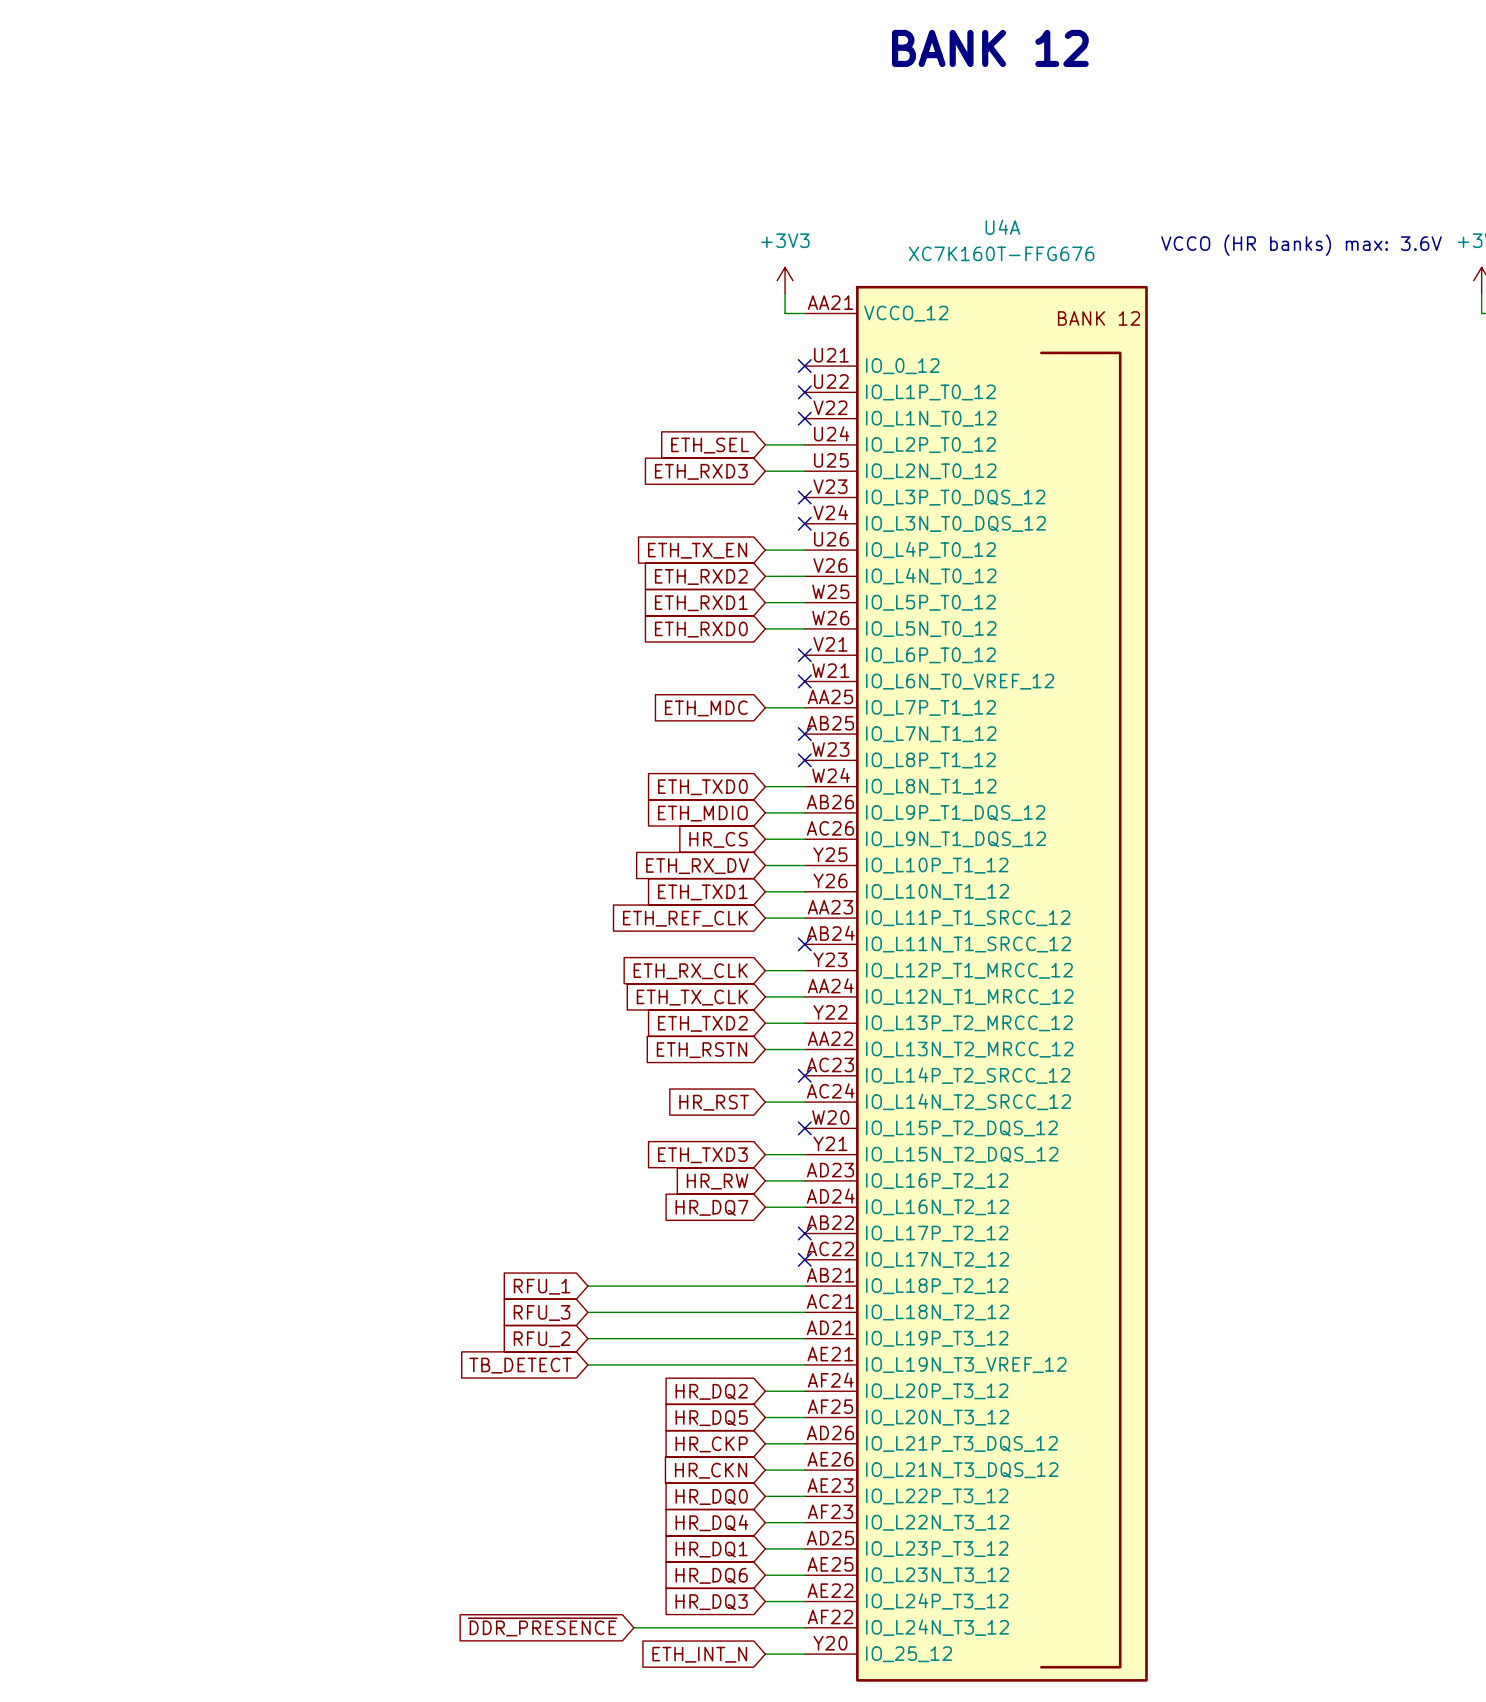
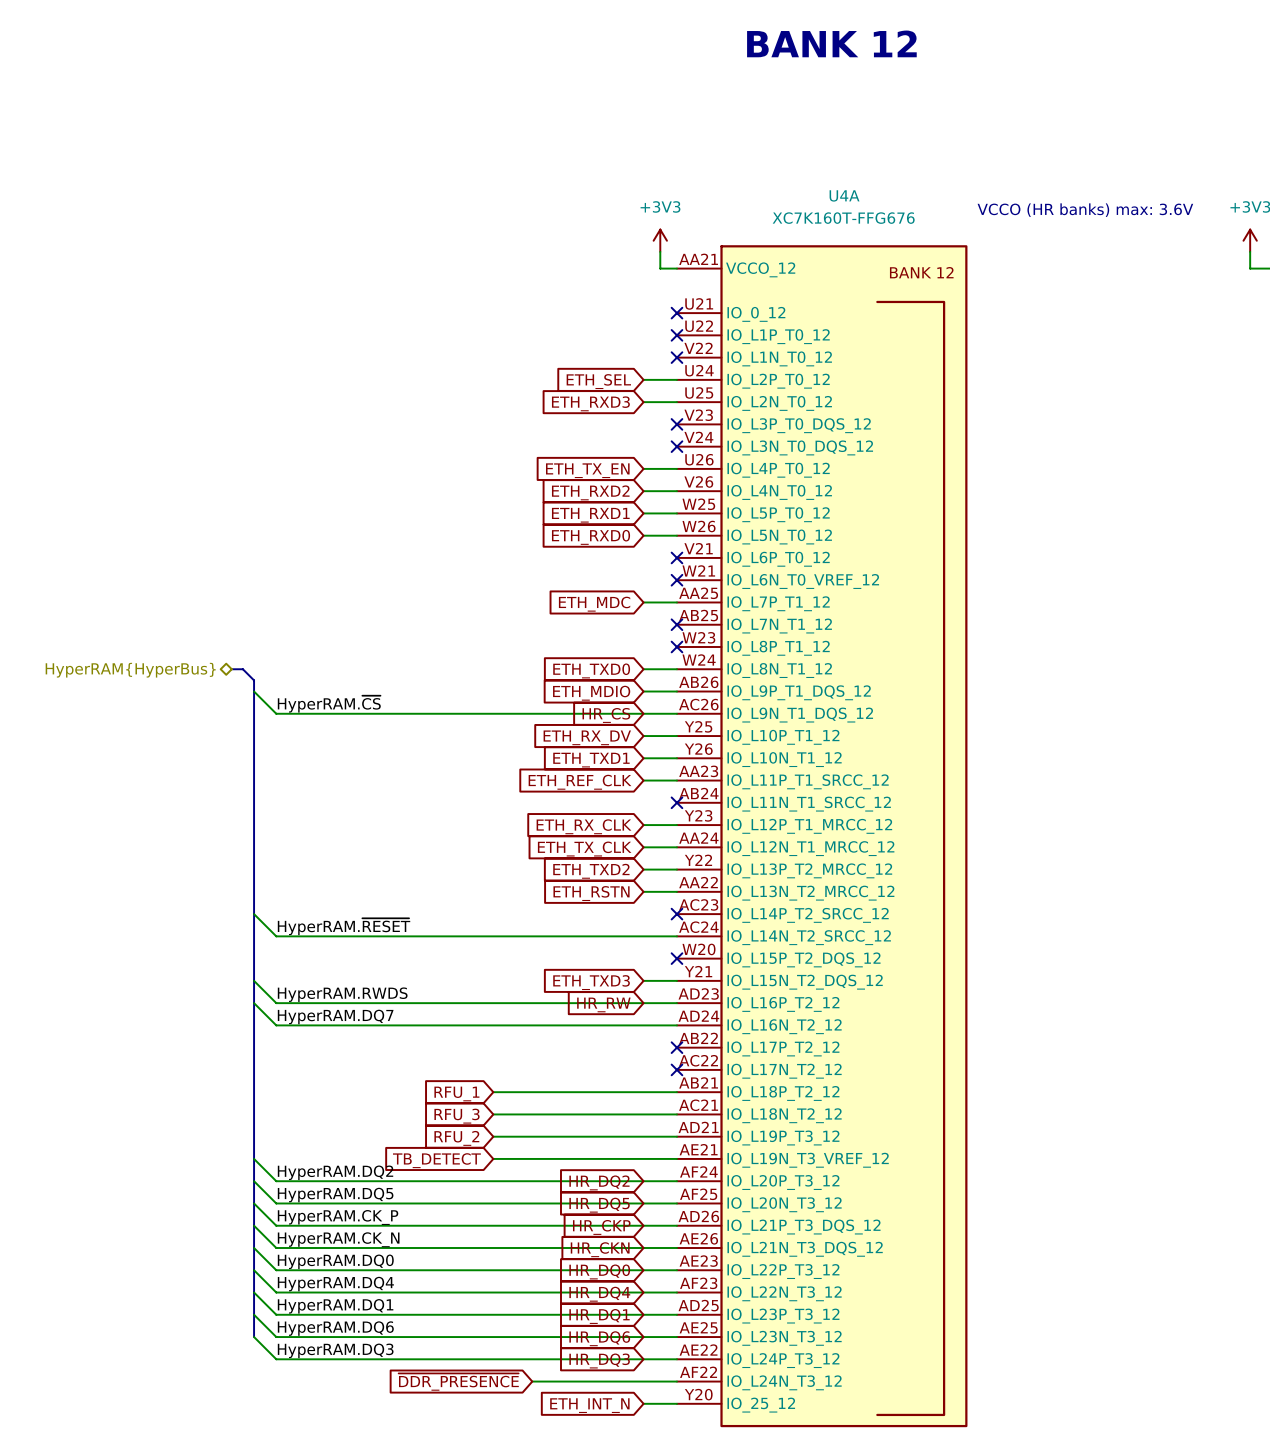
bus: none -> (231, 669) (242, 669) (254, 680) (254, 1337)
hierarchical label: none -> HyperRAM{HyperBus} (130, 670)
wire: none -> (254, 691) (276, 713) (643, 713)
label: none -> HyperRAM.~{CS} (329, 704)
wire: none -> (254, 914) (276, 936) (643, 936)
label: none -> HyperRAM.~{RESET} (344, 926)
global label: HR_RST (714, 1102) -> none
wire: none -> (254, 980) (276, 1003) (643, 1003)
label: none -> HyperRAM.RWDS (342, 994)
wire: none -> (254, 1003) (276, 1025) (643, 1025)
label: none -> HyperRAM.DQ7 (335, 1016)
global label: HR_DQ7 (711, 1207) -> none
wire: none -> (254, 1158) (276, 1181) (643, 1181)
label: none -> HyperRAM.DQ2 (335, 1172)
wire: none -> (254, 1181) (276, 1203)
label: none -> HyperRAM.DQ5 (335, 1195)
wire: none -> (254, 1203) (276, 1225) (643, 1225)
wire: none -> (276, 1203) (643, 1203)
label: none -> HyperRAM.CK_P (338, 1217)
wire: none -> (254, 1225) (276, 1248) (643, 1248)
label: none -> HyperRAM.CK_N (338, 1239)
wire: none -> (254, 1248) (276, 1270) (643, 1270)
label: none -> HyperRAM.DQ0 (335, 1261)
wire: none -> (254, 1270) (276, 1292)
label: none -> HyperRAM.DQ4 (335, 1284)
wire: none -> (254, 1292) (276, 1314) (643, 1314)
wire: none -> (276, 1292) (643, 1292)
label: none -> HyperRAM.DQ1 (335, 1306)
wire: none -> (254, 1314) (276, 1337) (643, 1337)
label: none -> HyperRAM.DQ6 (335, 1328)
wire: none -> (254, 1337) (276, 1359)
label: none -> HyperRAM.DQ3 (335, 1350)
wire: none -> (276, 1359) (643, 1359)

